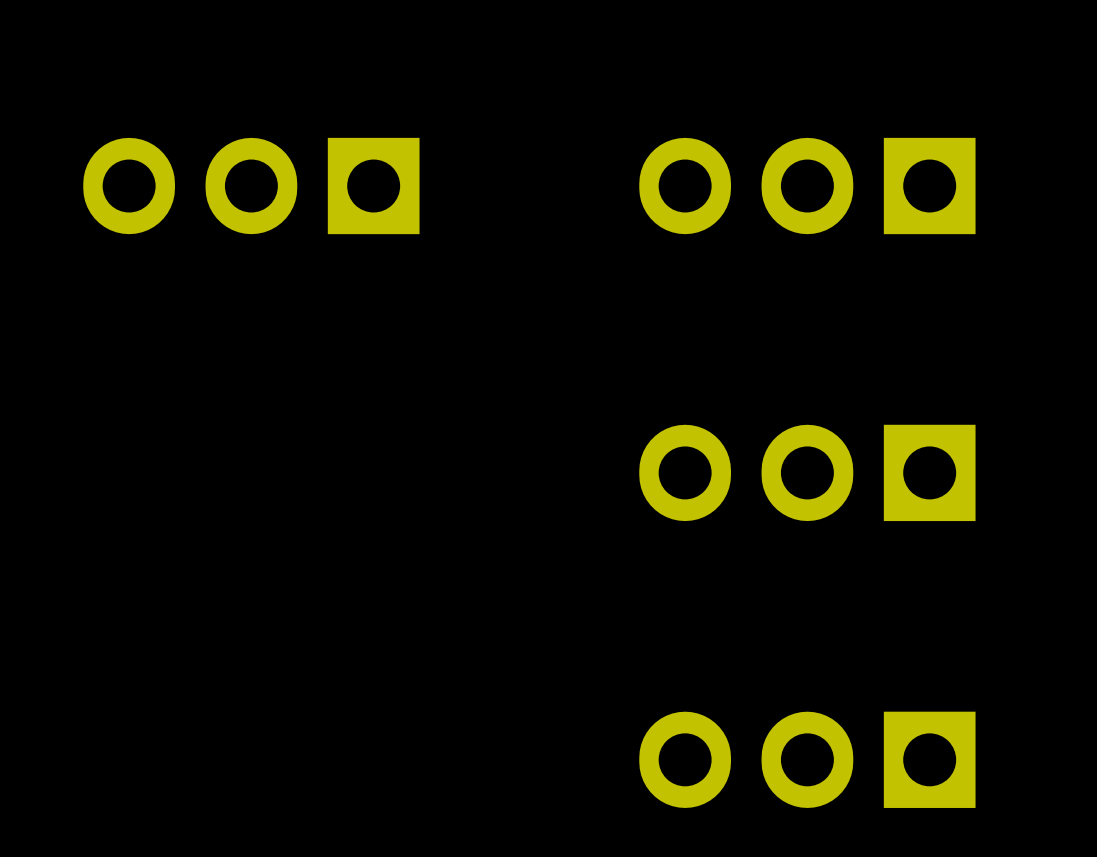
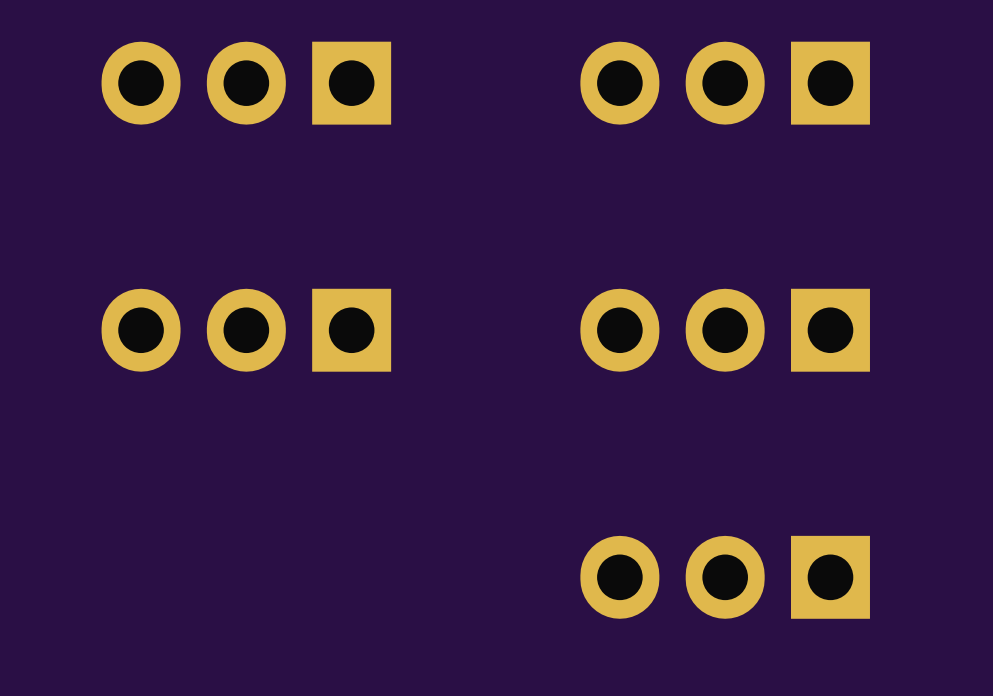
part: none -> (246, 330)

